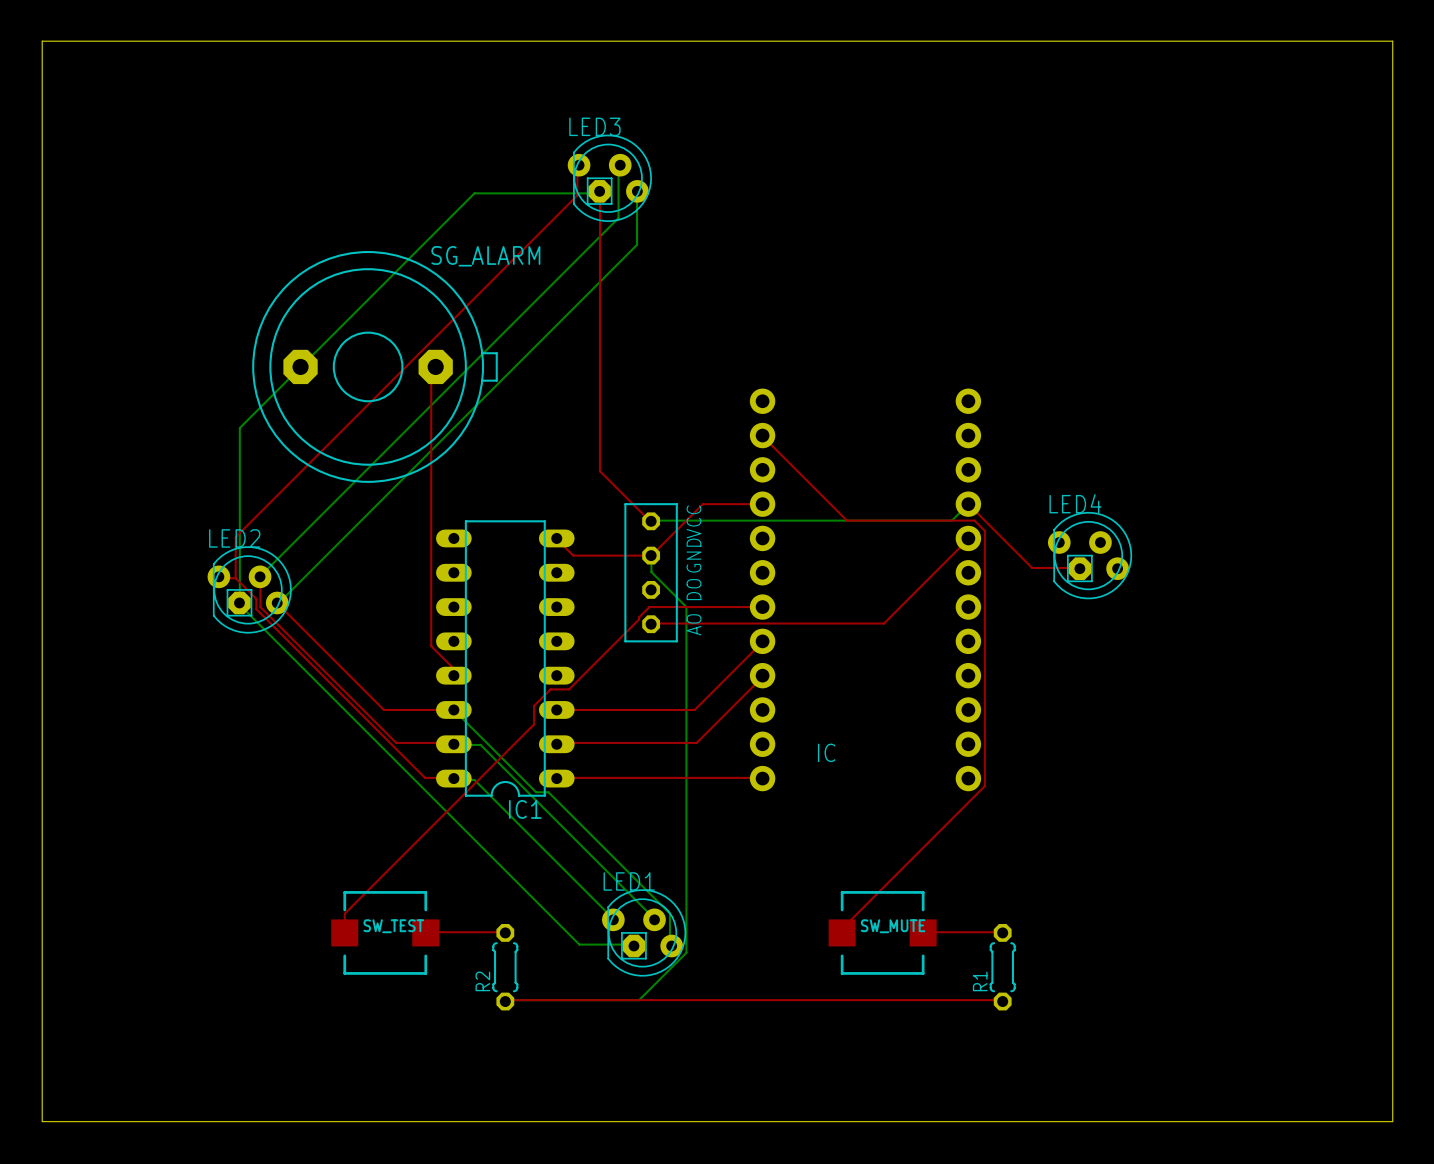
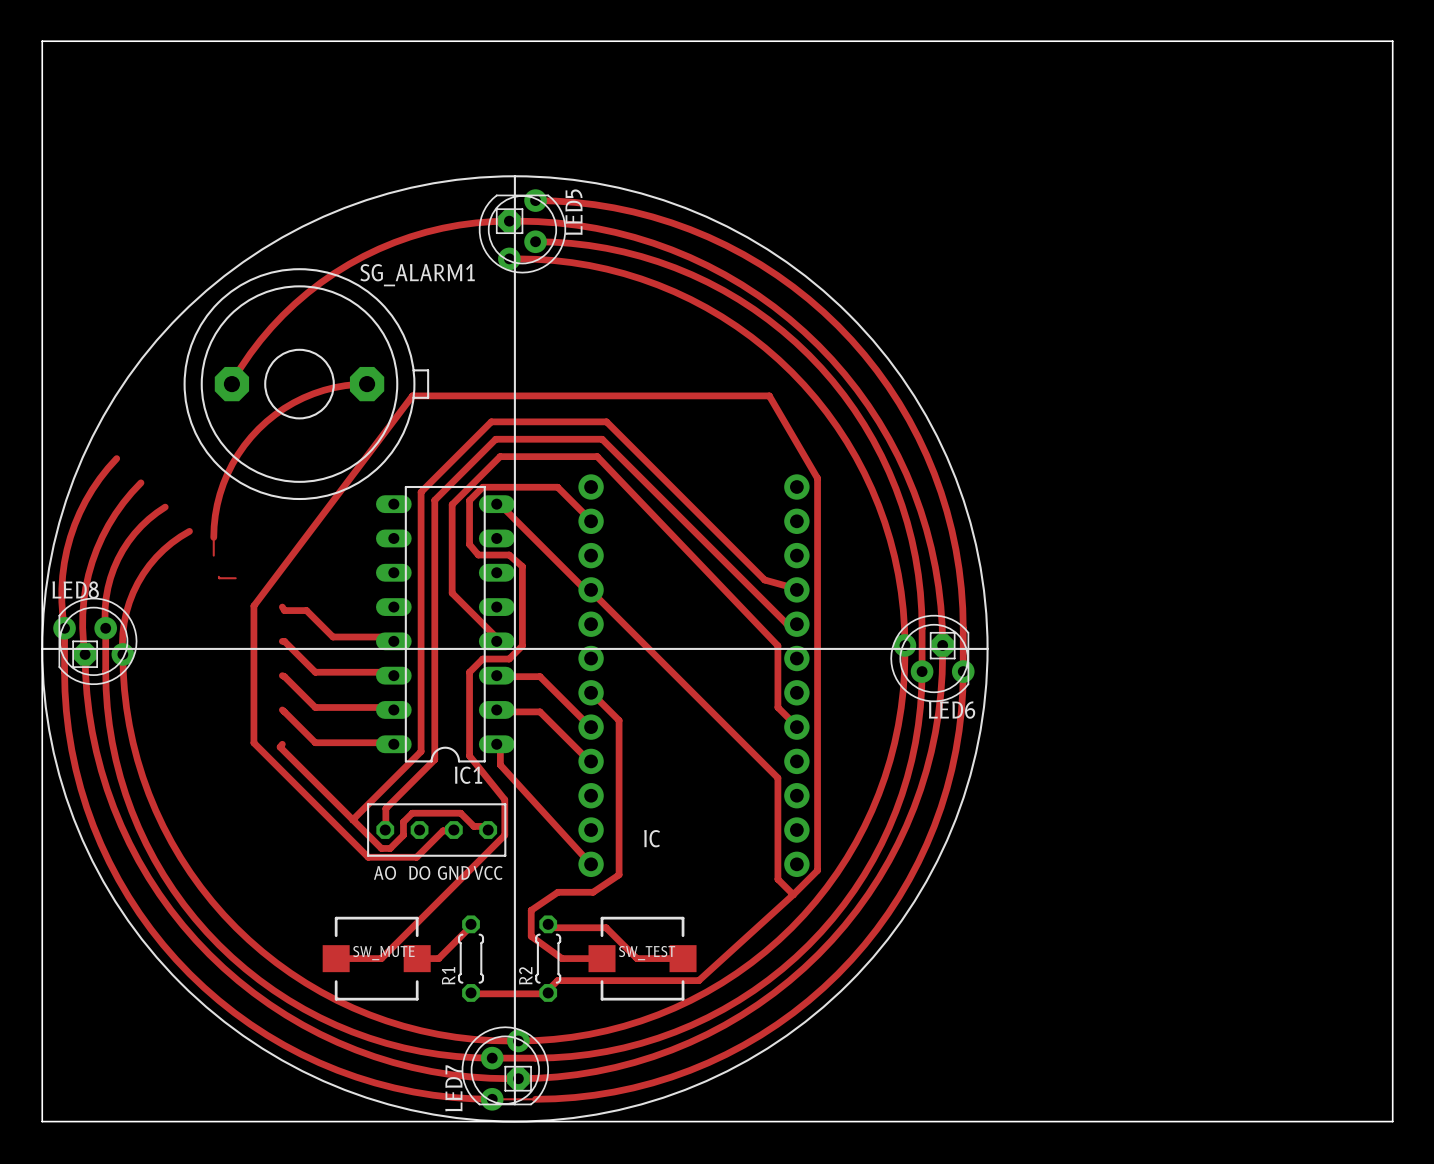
top track: (579, 165) (577, 166) (577, 195) (235, 537) (235, 578) (256, 598) (256, 609) (425, 777) (453, 778) -> none
bottom track: (620, 165) (618, 166) (618, 218) (260, 576) -> none
drawing: none -> [41, 175, 989, 1123]
line: none -> (514, 176) (514, 1104)
LED3: (609, 178) -> none
bottom track: (599, 191) (597, 193) (474, 193) (239, 428) (239, 602) (579, 944) (633, 946) -> none
top track: (599, 191) (599, 471) (651, 521) -> none
bottom track: (637, 191) (637, 244) (277, 602) -> none
top track: none -> (535, 200) (594, 204) (633, 211) (671, 222) (726, 245) (760, 264) (793, 286) (837, 325) (864, 355) (888, 386) (909, 420) (926, 455) (946, 511) (955, 549) (961, 588) (963, 671) (959, 730) (951, 769) (941, 807) (918, 862) (899, 896) (876, 929) (851, 959) (823, 987) (793, 1012) (760, 1035) (726, 1054) (690, 1070) (652, 1082) (614, 1092) (555, 1098) (452, 1097) (394, 1087) (356, 1077) (319, 1062) (267, 1035) (234, 1012) (204, 987) (163, 944) (139, 913) (118, 879) (100, 844) (86, 807) (71, 750) (65, 691) (64, 628) (61, 602) (64, 562) (74, 524) (85, 500) (99, 478) (116, 458)
LED5: none -> (522, 231)
top track: none -> (535, 241) (588, 245) (624, 252) (658, 261) (691, 274) (723, 290) (768, 319) (808, 354) (832, 381) (854, 409) (873, 440) (889, 472) (907, 522) (915, 557) (920, 592) (922, 671) (918, 724) (911, 760) (902, 794) (889, 827) (873, 859) (844, 904) (808, 944) (782, 968) (753, 990) (723, 1009) (691, 1025) (658, 1038) (624, 1047) (588, 1054) (553, 1057) (474, 1057) (438, 1054) (403, 1047) (352, 1032) (304, 1009) (273, 990) (245, 968) (218, 944) (194, 918) (173, 890) (154, 859) (138, 827) (125, 794) (112, 742) (106, 689) (105, 607) (107, 587) (113, 568) (128, 541) (141, 526) (165, 507)
top track: none -> (509, 258) (571, 262) (624, 273) (658, 285) (690, 299) (736, 326) (765, 348) (791, 372) (826, 412) (856, 457) (878, 505) (890, 539) (898, 574) (904, 627) (903, 690) (894, 742) (878, 794) (864, 826) (847, 857) (826, 887) (804, 914) (765, 951) (736, 973) (706, 992) (674, 1008) (641, 1020) (606, 1030) (571, 1037) (518, 1040) (455, 1037) (420, 1030) (386, 1020) (353, 1008) (321, 992) (276, 962) (248, 940) (223, 914) (200, 887) (180, 857) (163, 826) (148, 794) (137, 760) (129, 725) (124, 690) (122, 643) (124, 622) (129, 602) (143, 573) (156, 557) (171, 542) (189, 531)
SG_ALARM: (374, 366) -> none
top track: (435, 366) (431, 372) (431, 646) (453, 668) (453, 675) -> none
top track: none -> (232, 381) (260, 340) (295, 303) (334, 273) (379, 248) (426, 232) (475, 222) (518, 221) (577, 225) (634, 237) (671, 249) (724, 274) (774, 306) (818, 345) (856, 389) (889, 438) (914, 492) (926, 529) (938, 586) (942, 645) (940, 693) (931, 751) (914, 807) (889, 860) (868, 894) (831, 940) (789, 980) (758, 1004) (707, 1034) (671, 1050) (615, 1067) (557, 1076) (509, 1078)
SG_ALARM1: none -> (306, 384)
top track: none -> (367, 384) (334, 387) (303, 397) (275, 414) (251, 437) (232, 463) (219, 494) (214, 526) (213, 555)
top track: (762, 435) (846, 520) (974, 520) (984, 530) (984, 786) (842, 928) (842, 932) -> none
top track: none -> (140, 482) (115, 513) (102, 537) (92, 561) (83, 601) (82, 627) (85, 654)
top track: none -> (496, 504) (500, 504) (588, 592) (591, 589) (777, 777) (777, 879) (793, 894)
top track: (762, 504) (702, 504) (651, 555) (573, 555) (556, 538) -> none
bottom track: (968, 504) (951, 520) (651, 521) -> none
top track: (968, 504) (1032, 567) (1079, 568) -> none
top track: none -> (591, 521) (557, 487) (482, 487) (469, 500) (469, 544) (478, 555) (509, 555) (522, 566) (522, 645) (509, 659) (482, 659) (469, 672) (469, 755) (504, 799) (504, 835) (381, 958) (336, 958)
top track: (968, 538) (884, 623) (651, 624) -> none
bottom track: (651, 555) (651, 572) (686, 607) (686, 952) (639, 1000) (505, 1001) -> none
LED4: (1090, 555) -> none
part rotation: 0° (651, 572) -> 90° clockwise (436, 830)
part position: (651, 572) -> (436, 830)
top track: (260, 576) (260, 607) (396, 742) (453, 744) -> none
LED2: (249, 589) -> none
top track: none -> (796, 589) (764, 579) (606, 421) (491, 421) (421, 492) (421, 751) (352, 819)
IC position: (865, 589) -> (693, 675)
top track: (277, 602) (383, 709) (453, 709) -> none
top track: none -> (282, 607) (284, 610) (306, 610) (332, 637) (390, 637) (393, 641)
top track: (762, 607) (649, 607) (569, 689) (550, 689) (534, 705) (534, 724) (344, 913) (344, 932) -> none
top track: none -> (796, 624) (786, 623) (602, 439) (495, 439) (434, 500) (434, 759) (385, 808) (385, 830)
LED8: none -> (95, 641)
top track: none -> (282, 641) (315, 672) (390, 672) (393, 675)
top track: none -> (496, 641) (495, 637) (452, 593) (452, 504) (500, 456) (597, 456) (777, 645) (777, 707) (796, 727)
top track: (762, 641) (694, 709) (556, 709) -> none
line: none -> (42, 648) (987, 648)
top track: none -> (85, 654) (89, 713) (96, 751) (107, 789) (121, 825) (138, 860) (159, 894) (182, 925) (209, 954) (253, 993) (286, 1015) (320, 1034) (356, 1050) (393, 1062) (431, 1071) (470, 1076) (509, 1078)
IC1 position: (505, 658) -> (445, 624)
LED6: none -> (932, 658)
top track: none -> (282, 675) (315, 707) (390, 707) (393, 709)
top track: none -> (496, 675) (540, 676) (591, 727)
top track: (762, 675) (696, 742) (556, 744) -> none
top track: none -> (591, 692) (619, 720) (619, 874) (593, 892) (557, 892) (531, 910) (531, 936) (562, 958) (602, 958)
top track: none -> (282, 709) (315, 742) (393, 744)
bottom track: (453, 709) (536, 792) (548, 792) (669, 913) (669, 944) (671, 946) -> none
top track: none -> (496, 709) (500, 711) (540, 711) (591, 761)
top track: none -> (282, 744) (280, 747) (381, 848) (390, 848) (403, 835) (403, 822) (412, 813) (460, 813) (473, 826) (487, 826) (488, 830)
bottom track: (453, 744) (480, 744) (654, 919) -> none
top track: none -> (496, 744) (500, 747) (500, 765) (591, 864)
bottom track: (453, 778) (474, 779) (613, 919) -> none
top track: (556, 778) (762, 778) -> none
top track: none -> (453, 830) (443, 830) (416, 857) (368, 857) (253, 742) (253, 605) (412, 395) (769, 395) (817, 478) (817, 870) (793, 894)
top track: none -> (793, 894) (698, 980) (557, 980) (548, 989) (548, 992) (544, 993) (471, 992)
top track: none -> (471, 924) (438, 958) (417, 958)
top track: none -> (548, 924) (548, 927) (606, 927) (636, 958) (683, 958)
SW_TEST position: (385, 932) -> (642, 958)
top track: (425, 932) (505, 932) -> none
LED1: (644, 932) -> none
SW_MUTE: (882, 932) -> none
top track: (923, 932) (1002, 932) -> none
SW_MUTE: none -> (376, 958)
R2 position: (505, 967) -> (548, 958)
R1 position: (1002, 967) -> (471, 958)
top track: (505, 1001) (1002, 1001) -> none
LED7: none -> (505, 1068)

